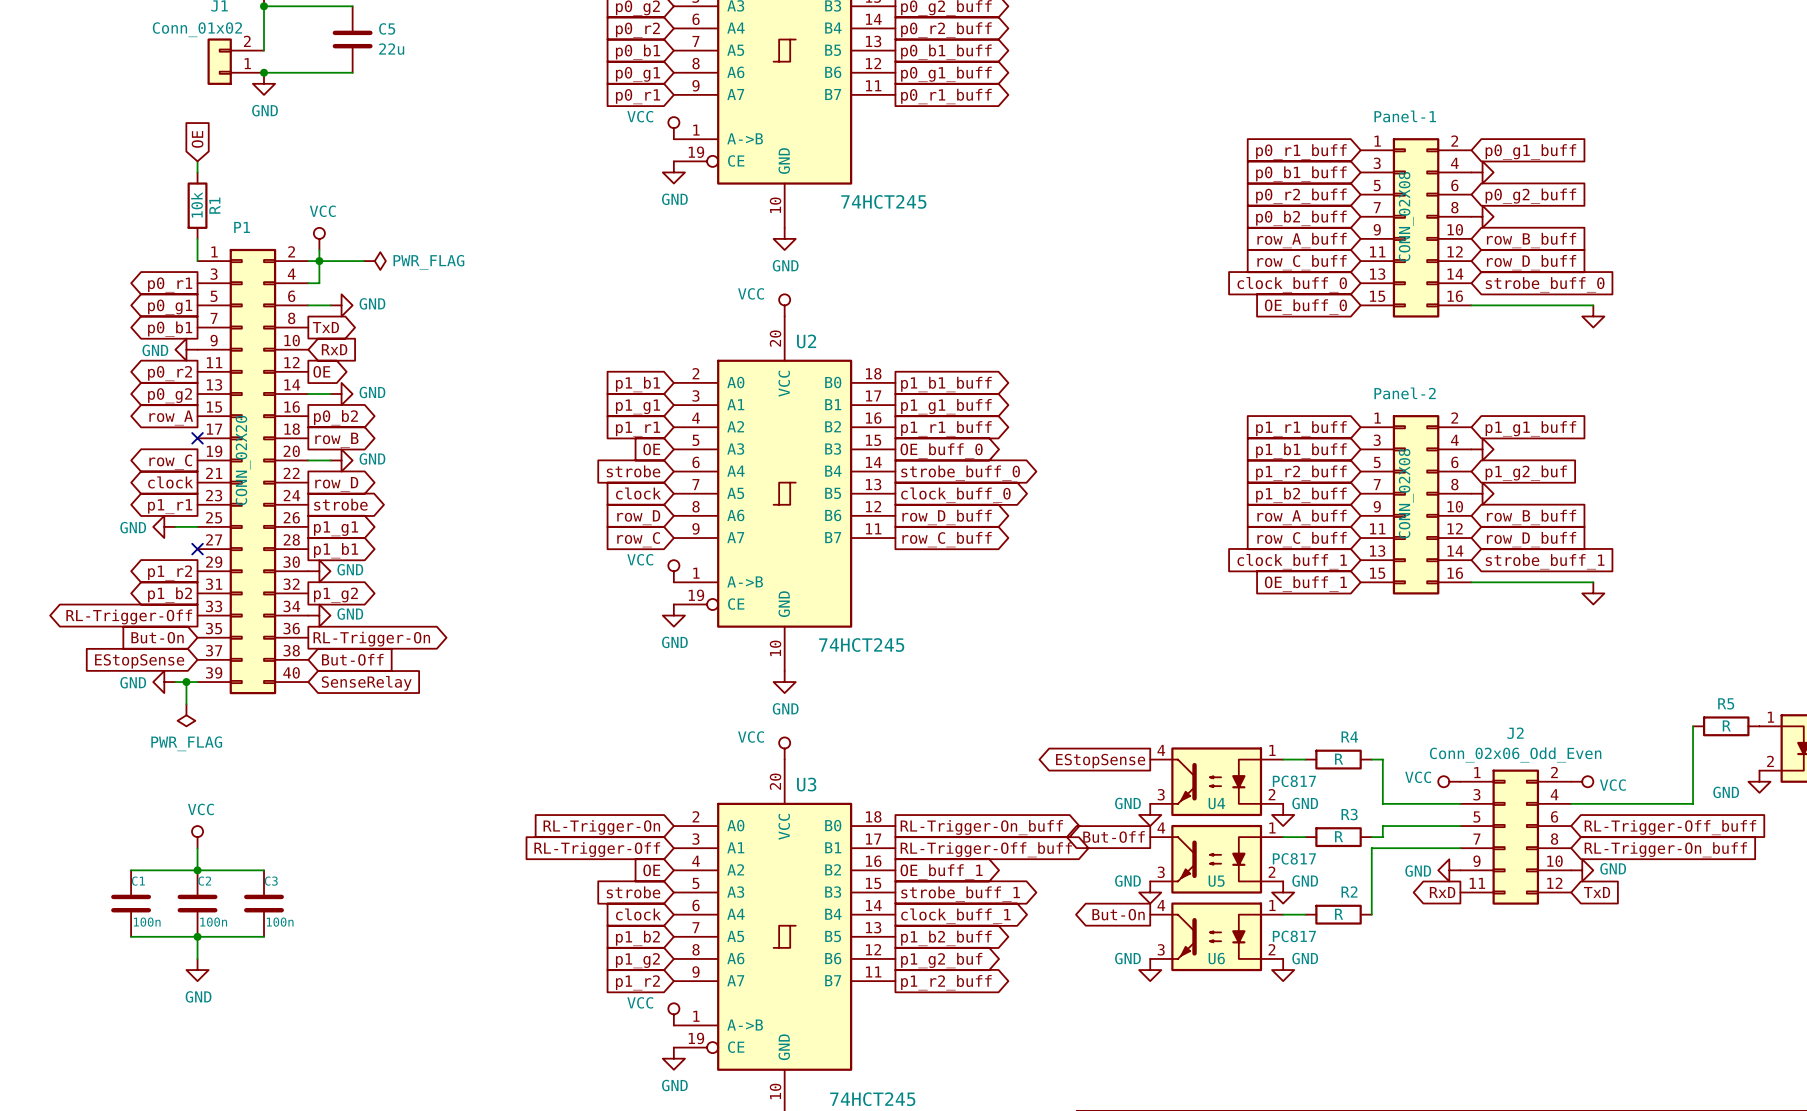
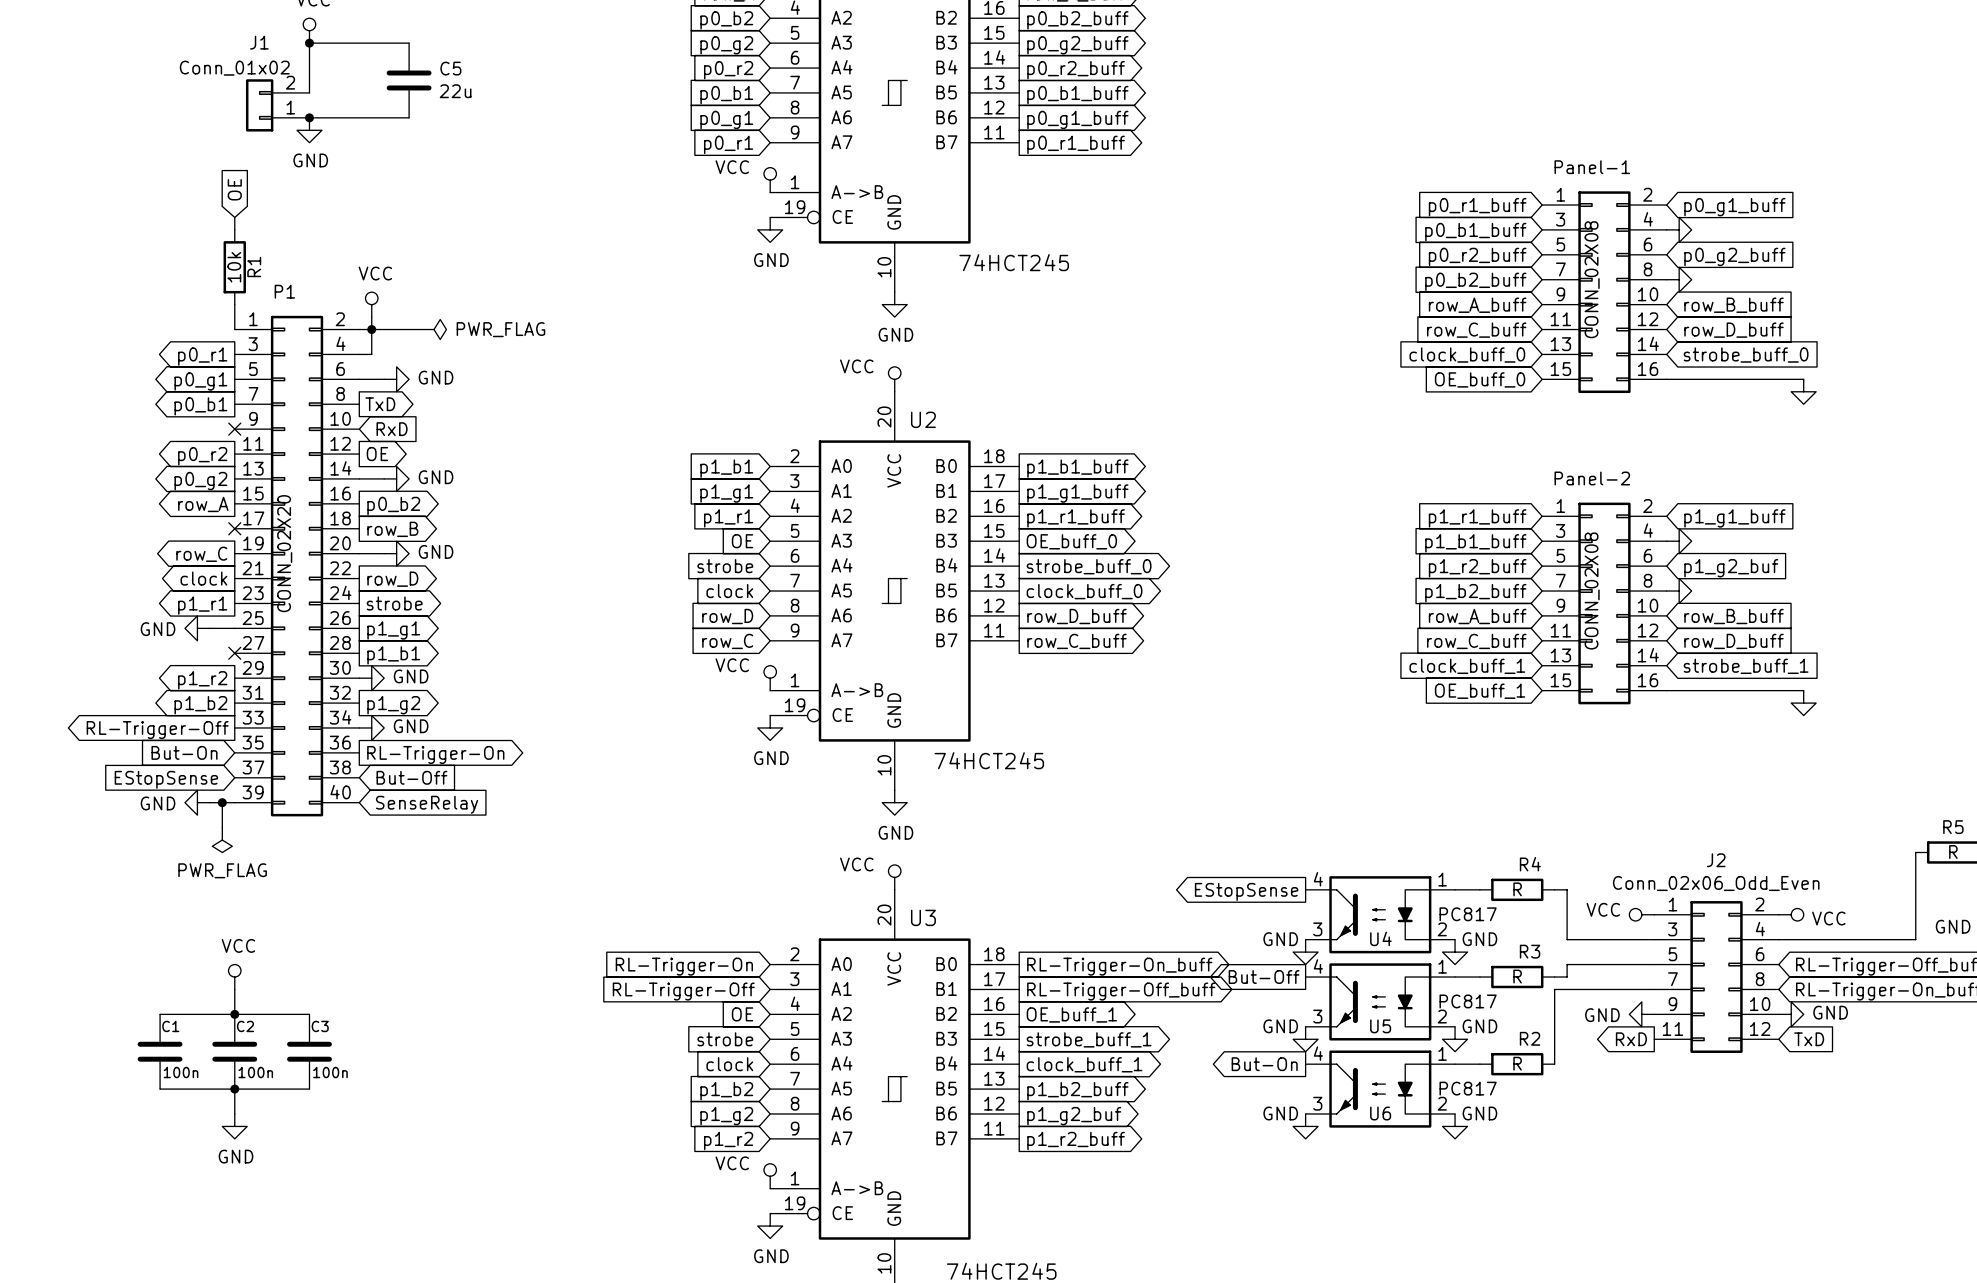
power symbol: GND (186, 349) -> none
no-connect mark: none -> (234, 429)

